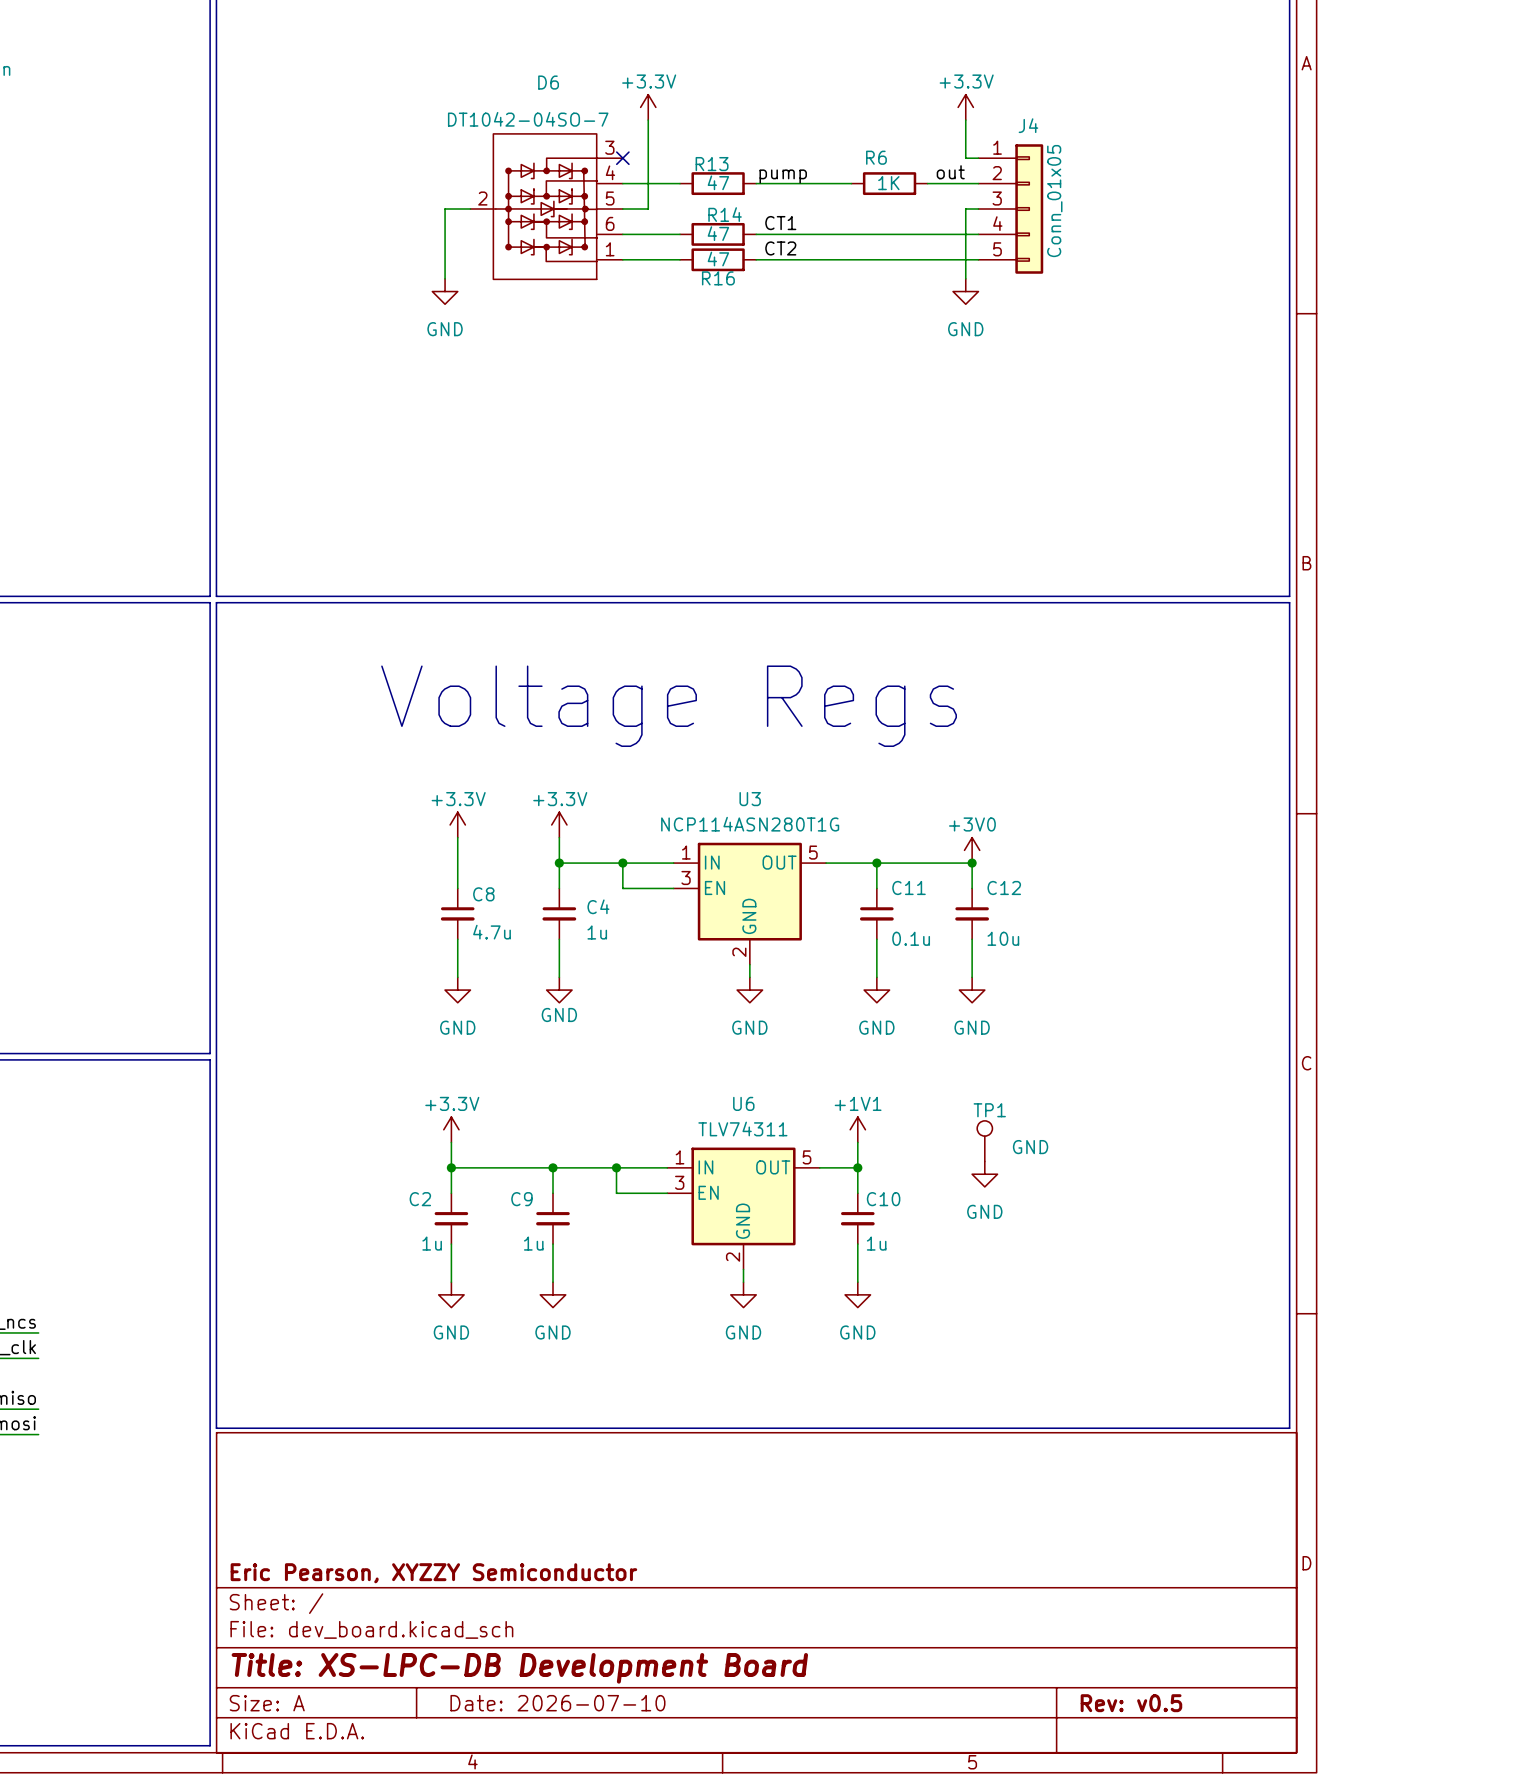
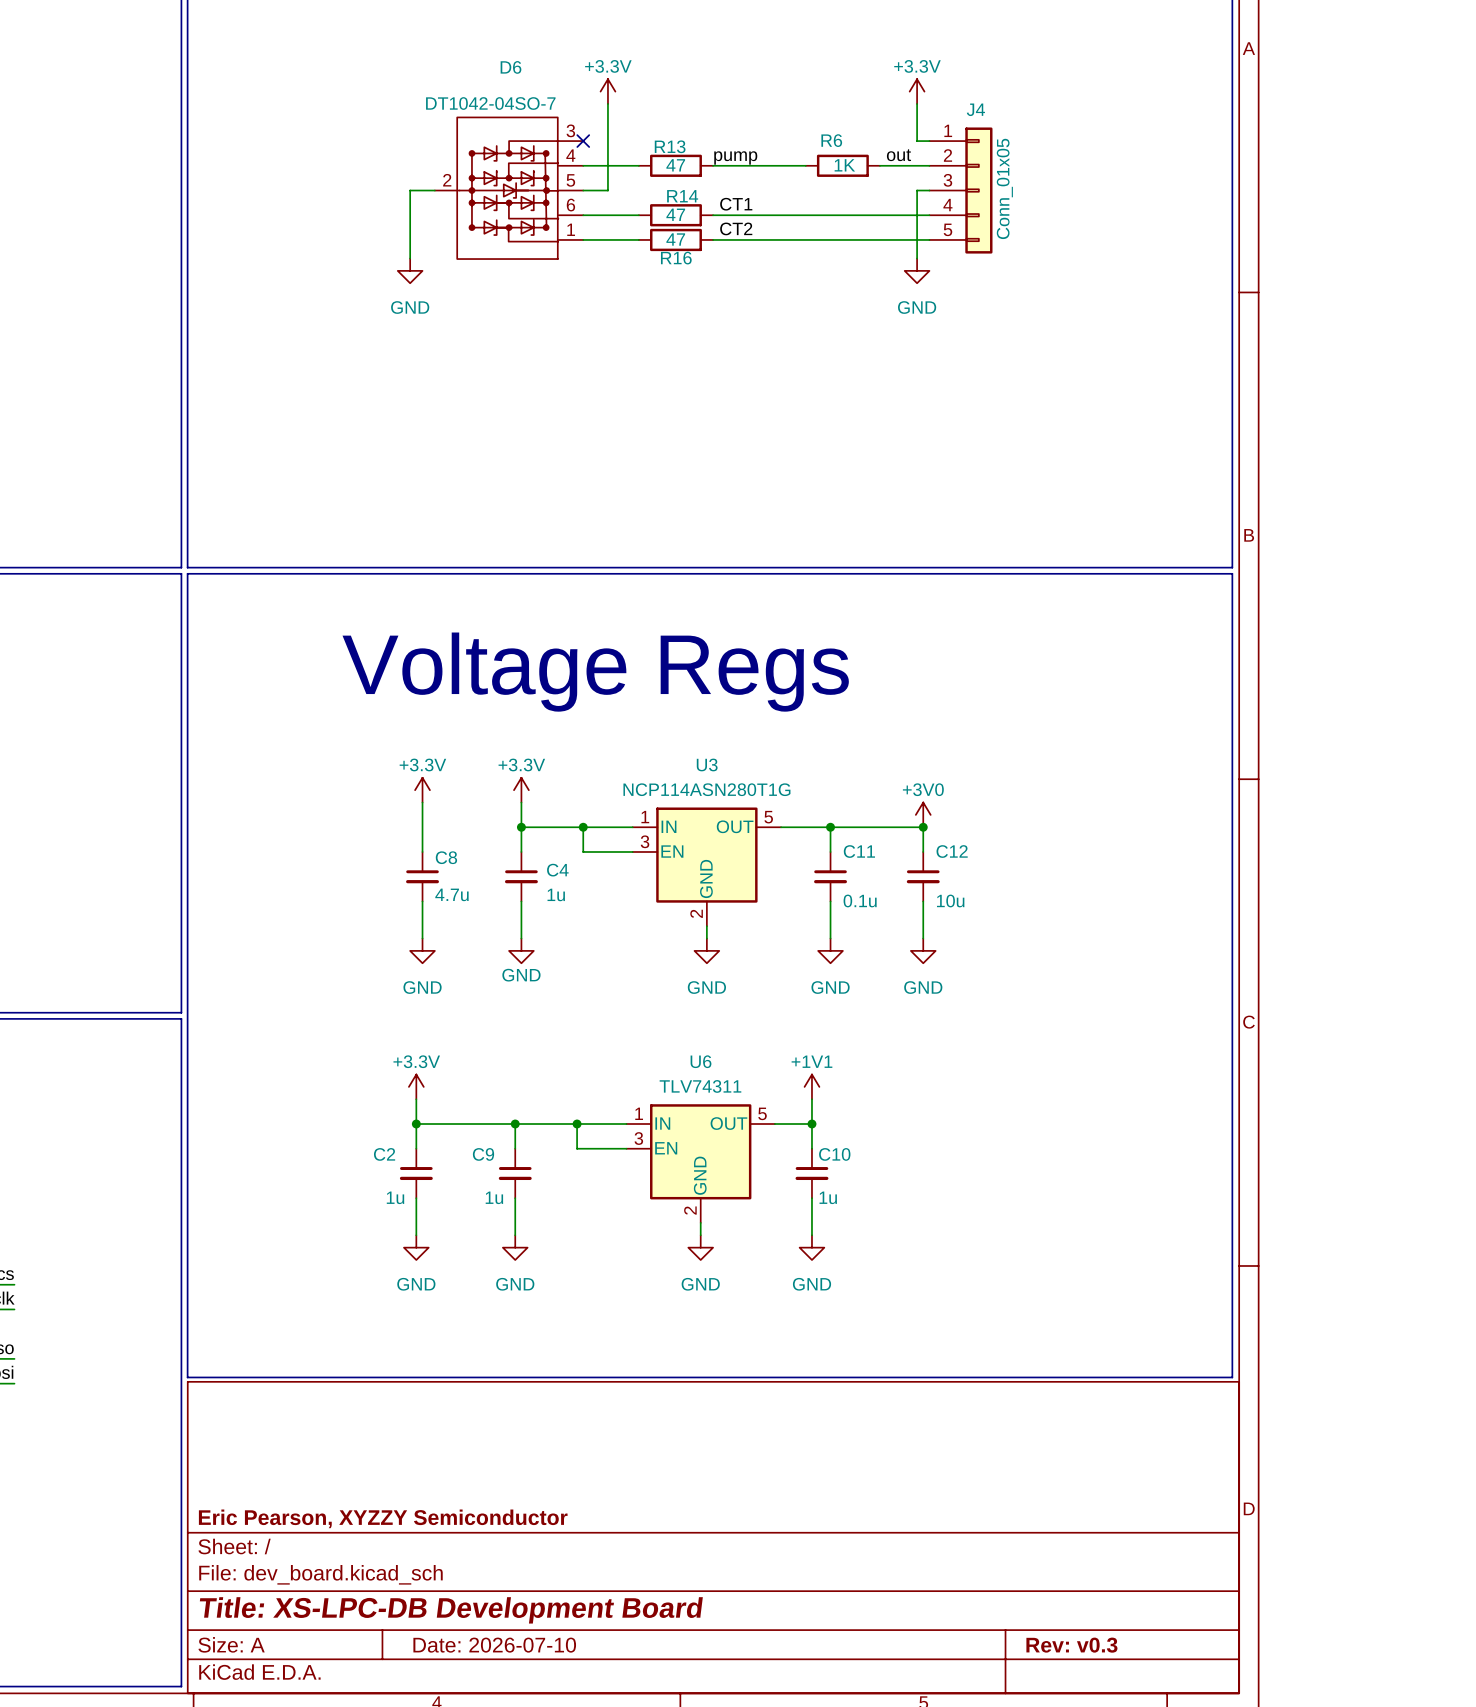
TP1: GND (984, 1141) -> none
power symbol: GND (984, 1174) -> none
title block: Rev: v0.5 (1131, 1703) -> Rev: v0.3 (1071, 1645)

